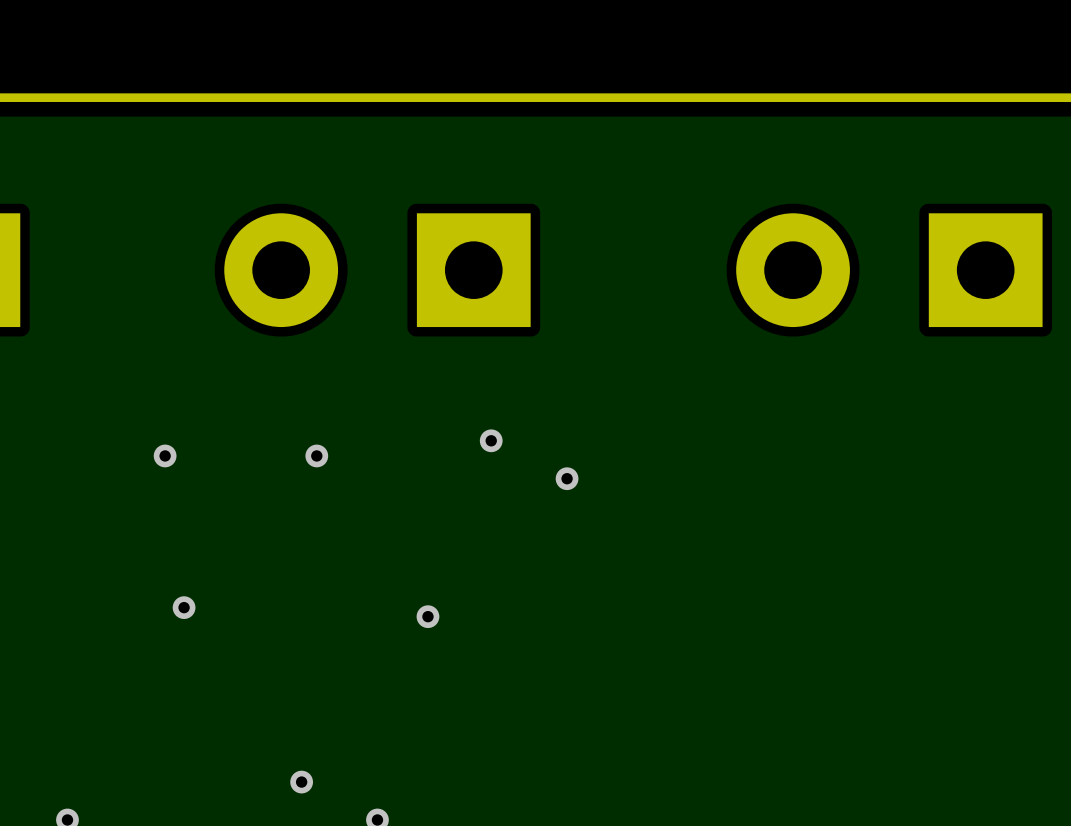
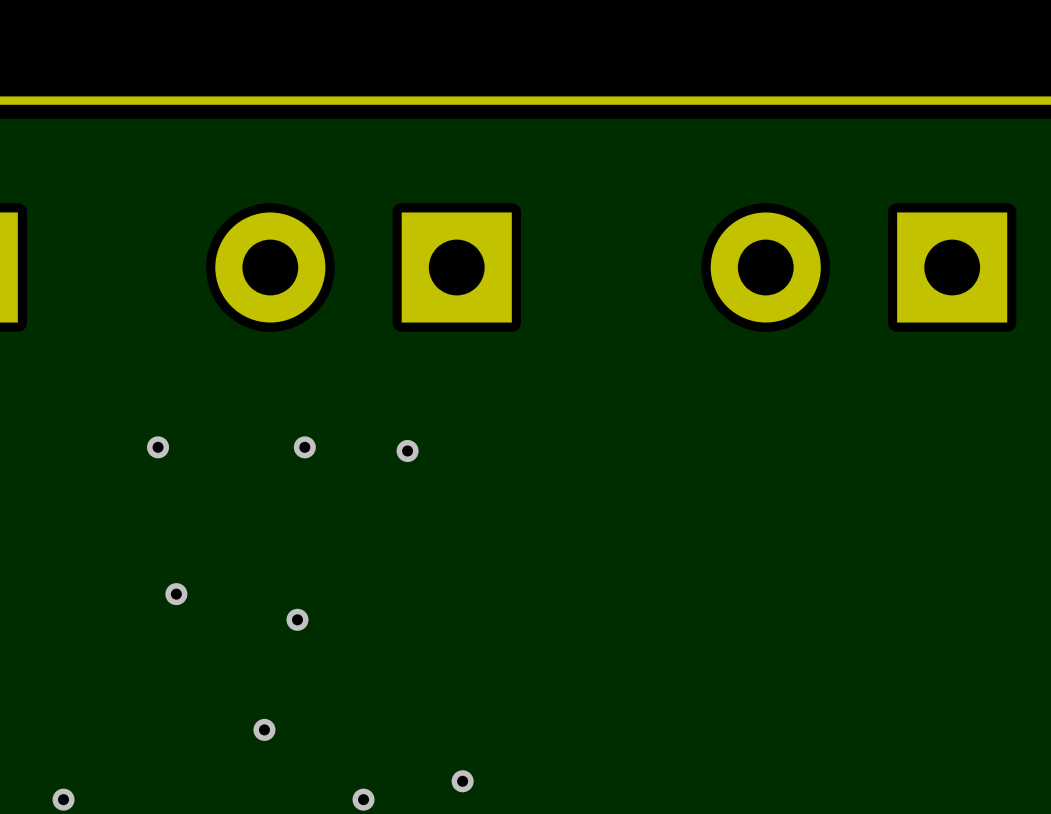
via position: (491, 440) -> (407, 451)
via: (567, 478) -> none
via: (427, 616) -> none
via: none -> (297, 619)
via position: (301, 782) -> (264, 729)
via: none -> (462, 781)

